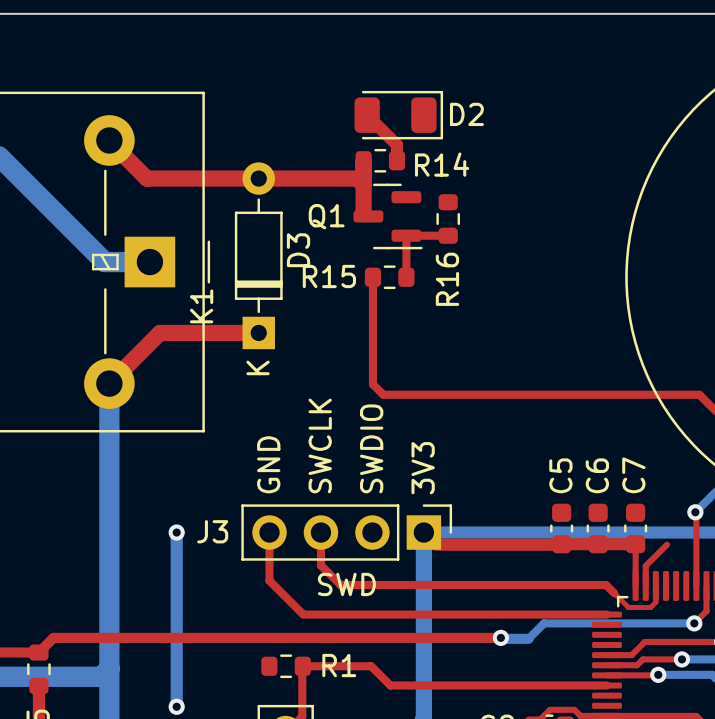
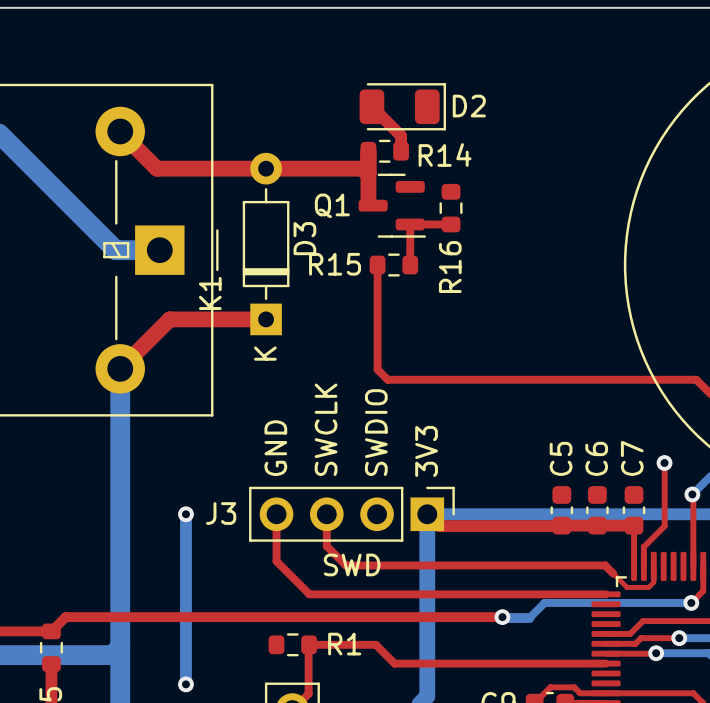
via: none -> (664, 462)
top track: none -> (664, 463) (664, 526)

